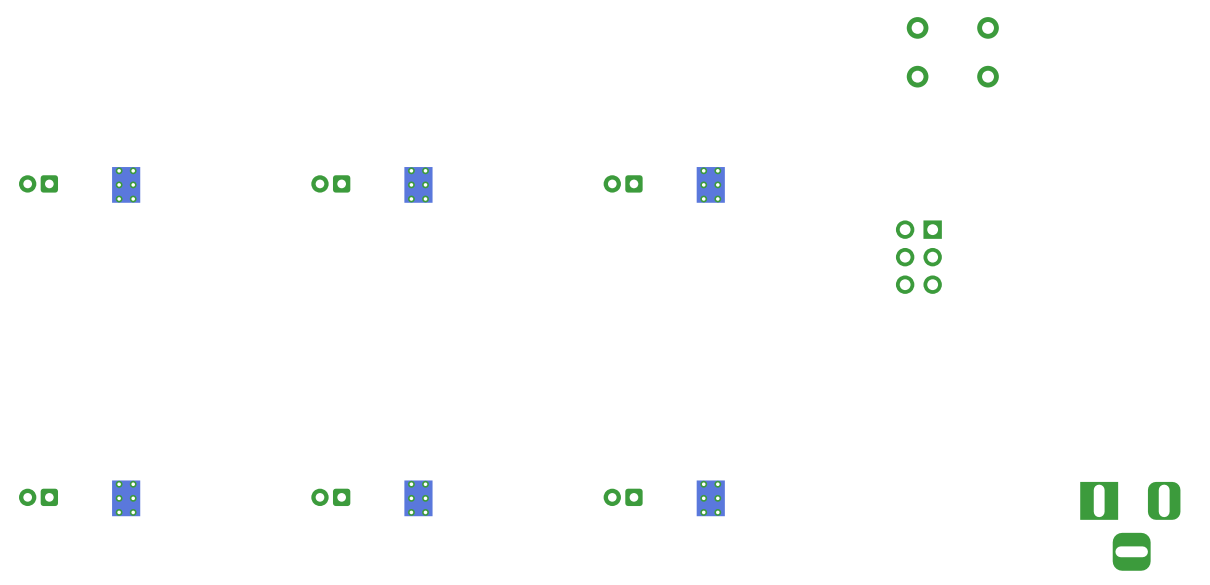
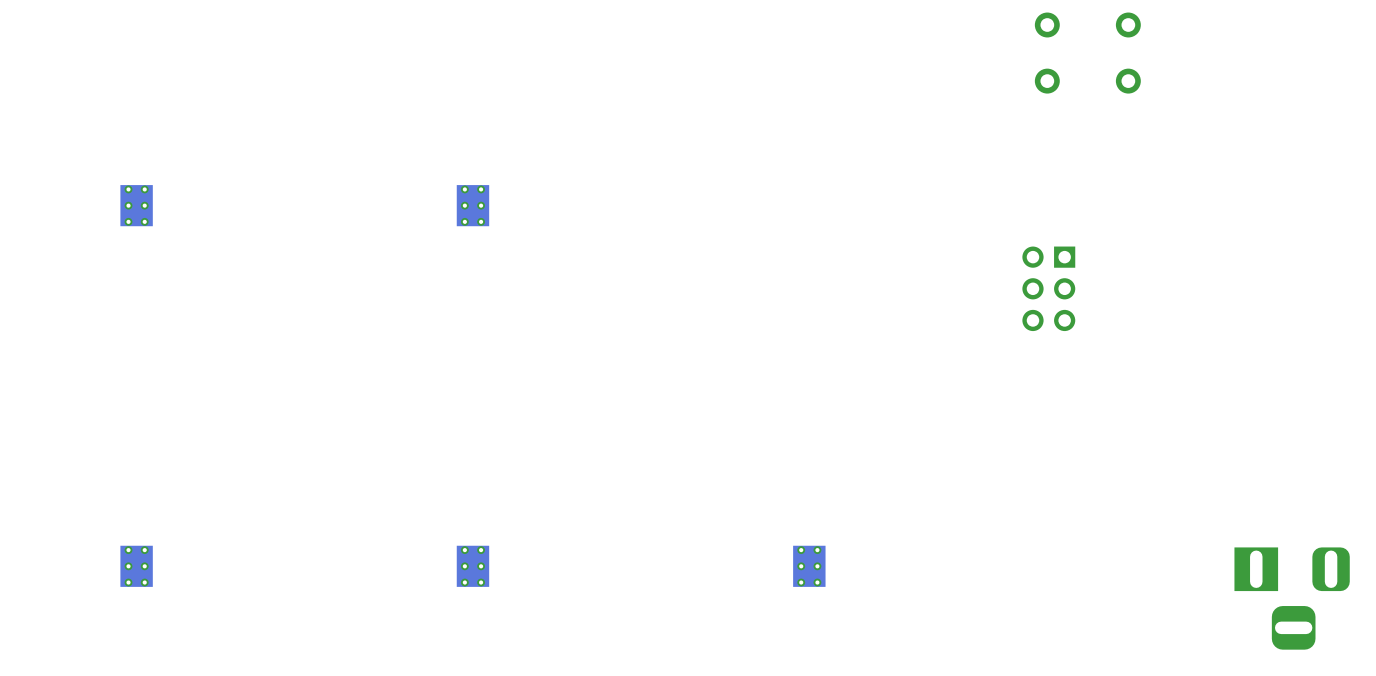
part: (38, 183) -> none
part: (330, 183) -> none
part: (623, 183) -> none
part: (710, 184) -> none
part: (38, 497) -> none
part: (330, 497) -> none
part: (623, 497) -> none

